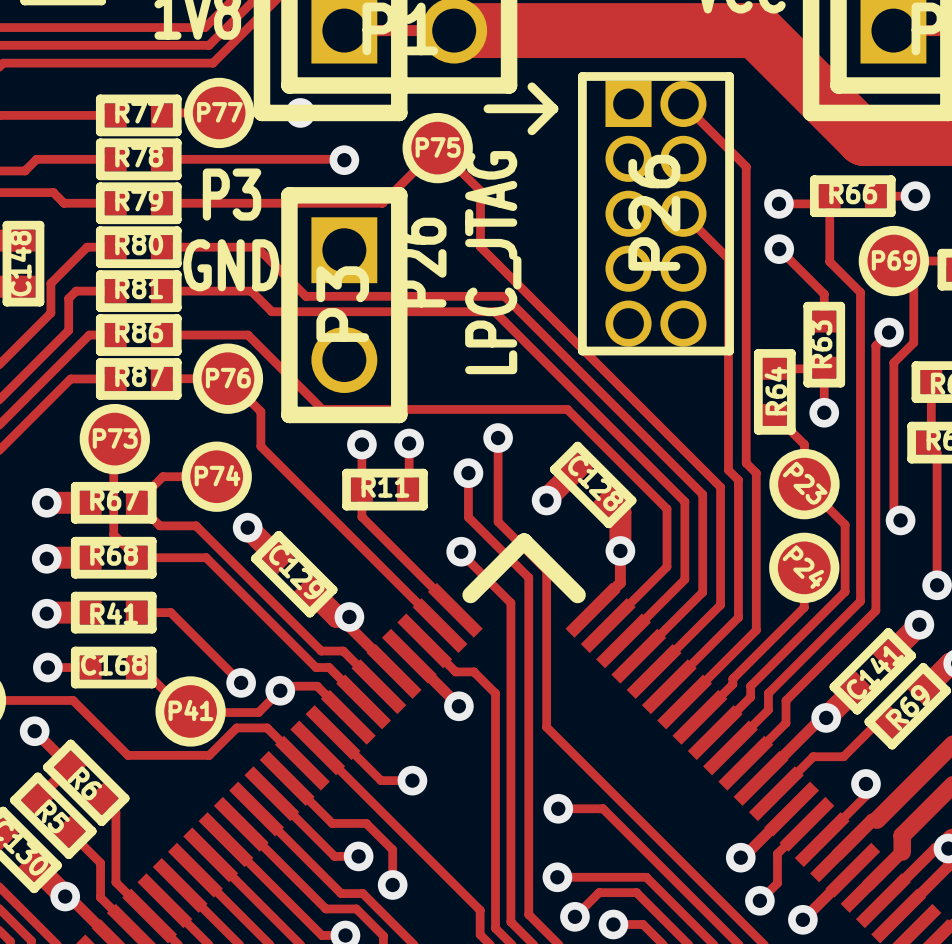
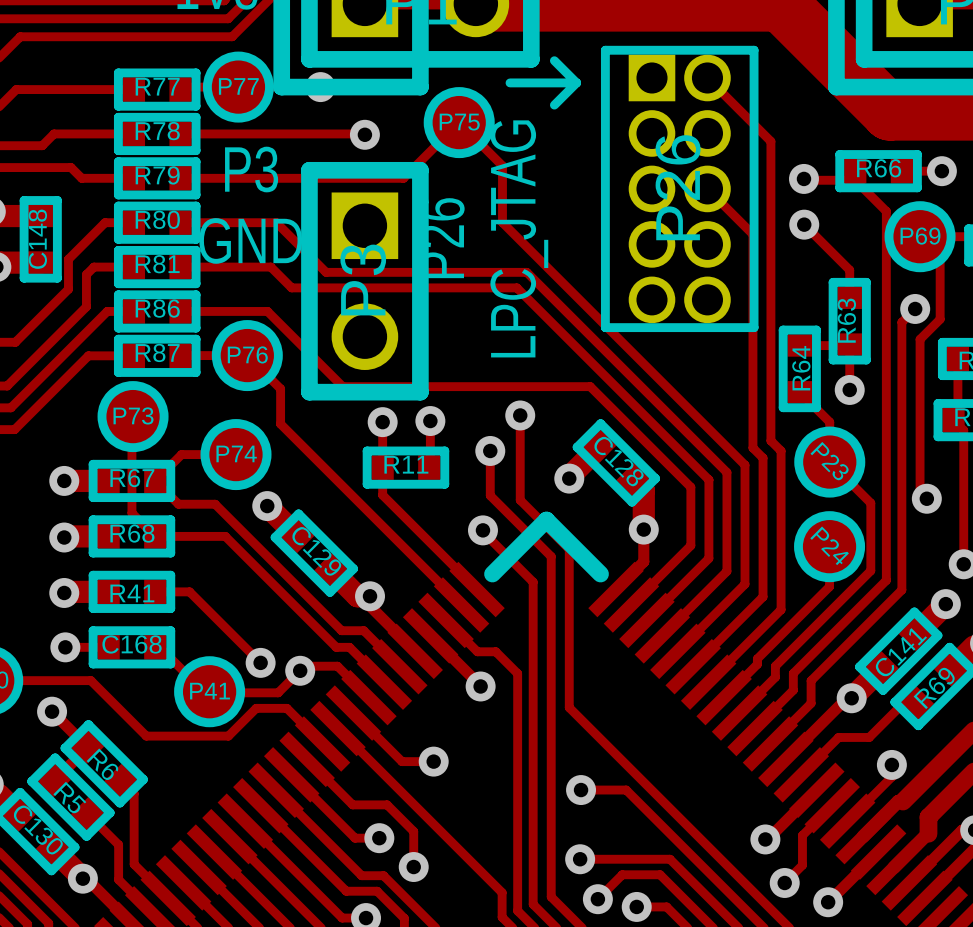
track: (778, 203) (822, 203) (829, 196) (829, 261) (860, 292) -> (803, 178) (855, 180) (886, 211) (886, 268)

